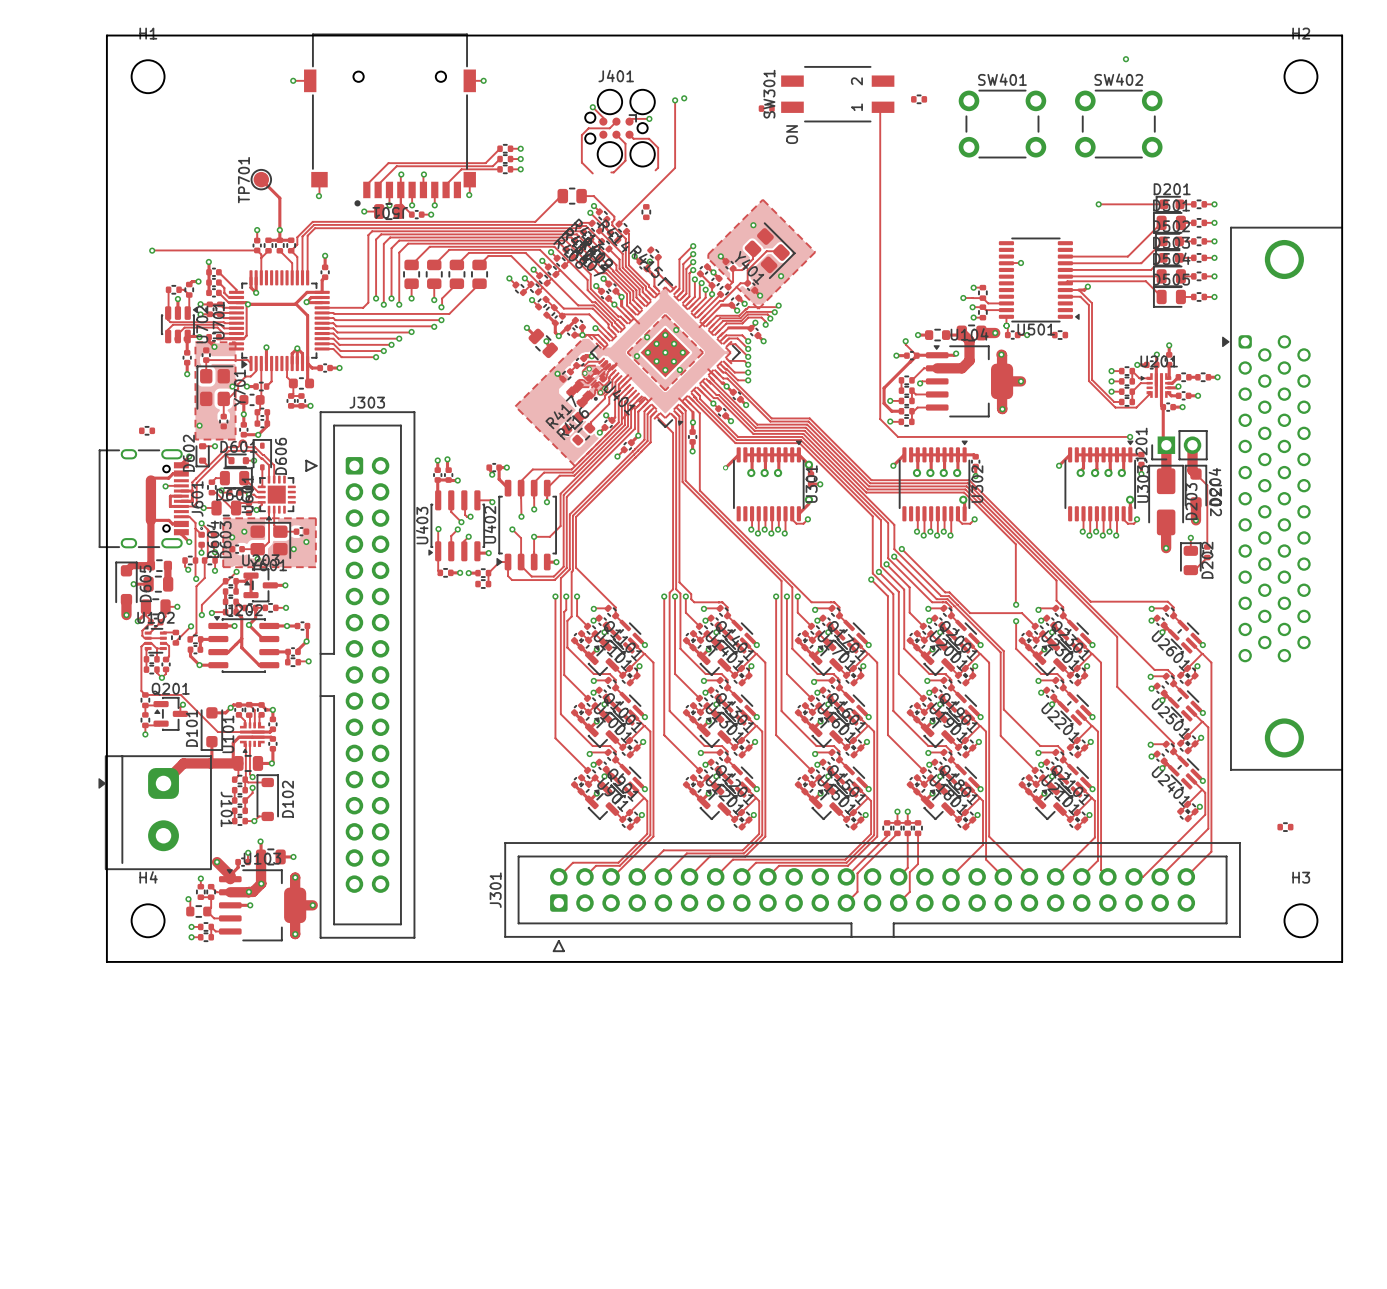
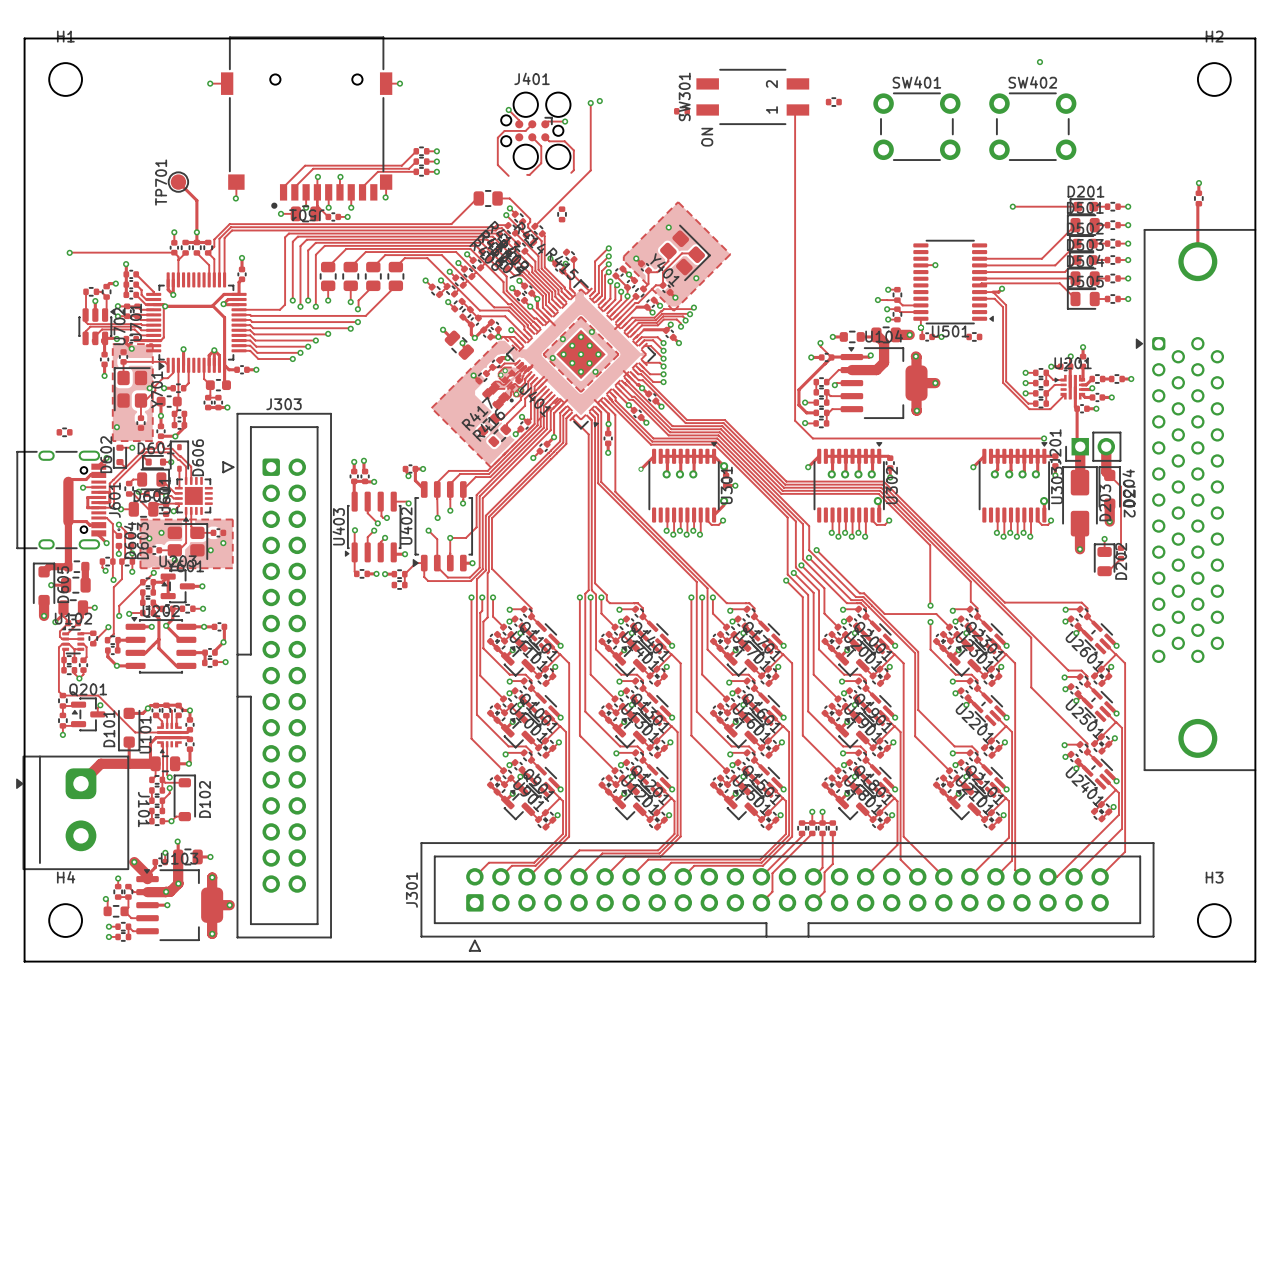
track: none -> (1198, 183) (1198, 193)
via: none -> (1198, 183)
part: none -> (1198, 198)
track: none -> (1198, 203) (1197, 261)
part: (1285, 827) -> none

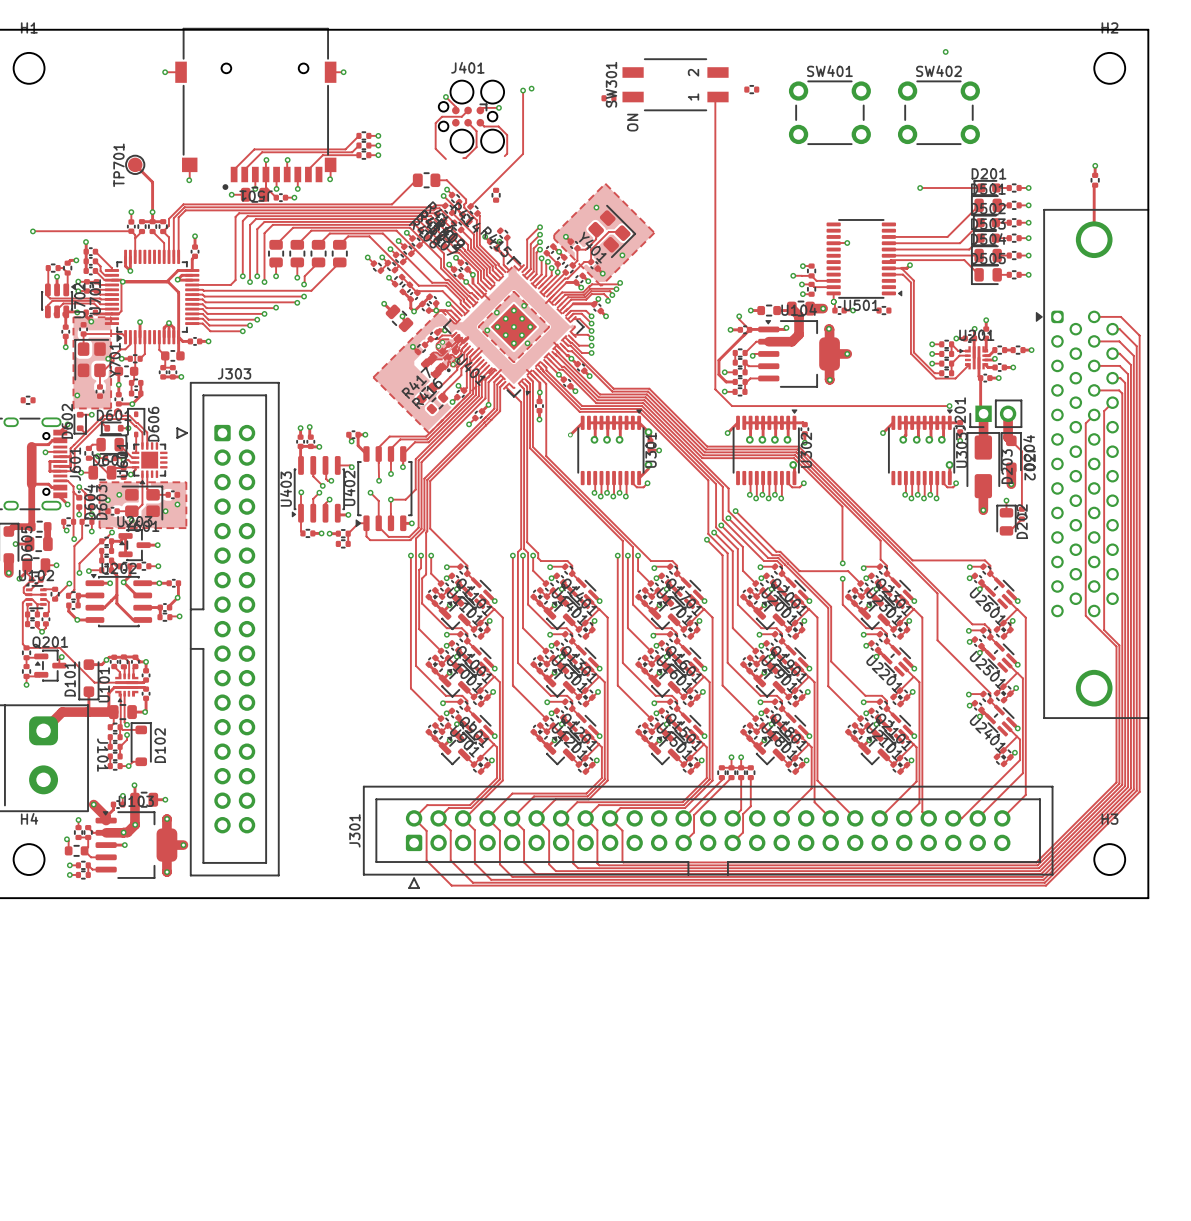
track: none -> (1094, 316) (1120, 316) (1139, 335) (1139, 792) (1046, 885) (451, 885) (426, 860) (426, 830) (414, 818)
track: none -> (1112, 329) (1119, 329) (1136, 346) (1136, 790) (1044, 882) (472, 882) (450, 860) (450, 830) (438, 818)
track: none -> (1094, 341) (1119, 341) (1133, 355) (1133, 789) (1043, 879) (491, 879) (474, 863) (474, 830) (463, 818)
track: none -> (1112, 353) (1119, 353) (1130, 364) (1130, 788) (1042, 876) (512, 876) (499, 864) (499, 830) (487, 818)
track: none -> (1094, 365) (1119, 365) (1128, 374) (1128, 787) (1041, 874) (535, 874) (524, 862) (524, 830) (512, 818)
track: none -> (1112, 378) (1120, 378) (1125, 382) (1125, 786) (1040, 871) (555, 871) (549, 864) (549, 830) (536, 818)
track: none -> (1094, 390) (1119, 390) (1122, 393) (1122, 784) (1038, 868) (578, 868) (573, 863) (573, 830) (561, 818)
track: none -> (1112, 402) (1104, 411) (1104, 630) (1119, 645) (1119, 783) (1037, 865) (599, 865) (597, 863) (597, 830) (585, 818)
track: none -> (1094, 414) (1085, 423) (1085, 615) (1116, 646) (1116, 782) (1036, 862) (623, 862) (622, 830) (610, 818)

